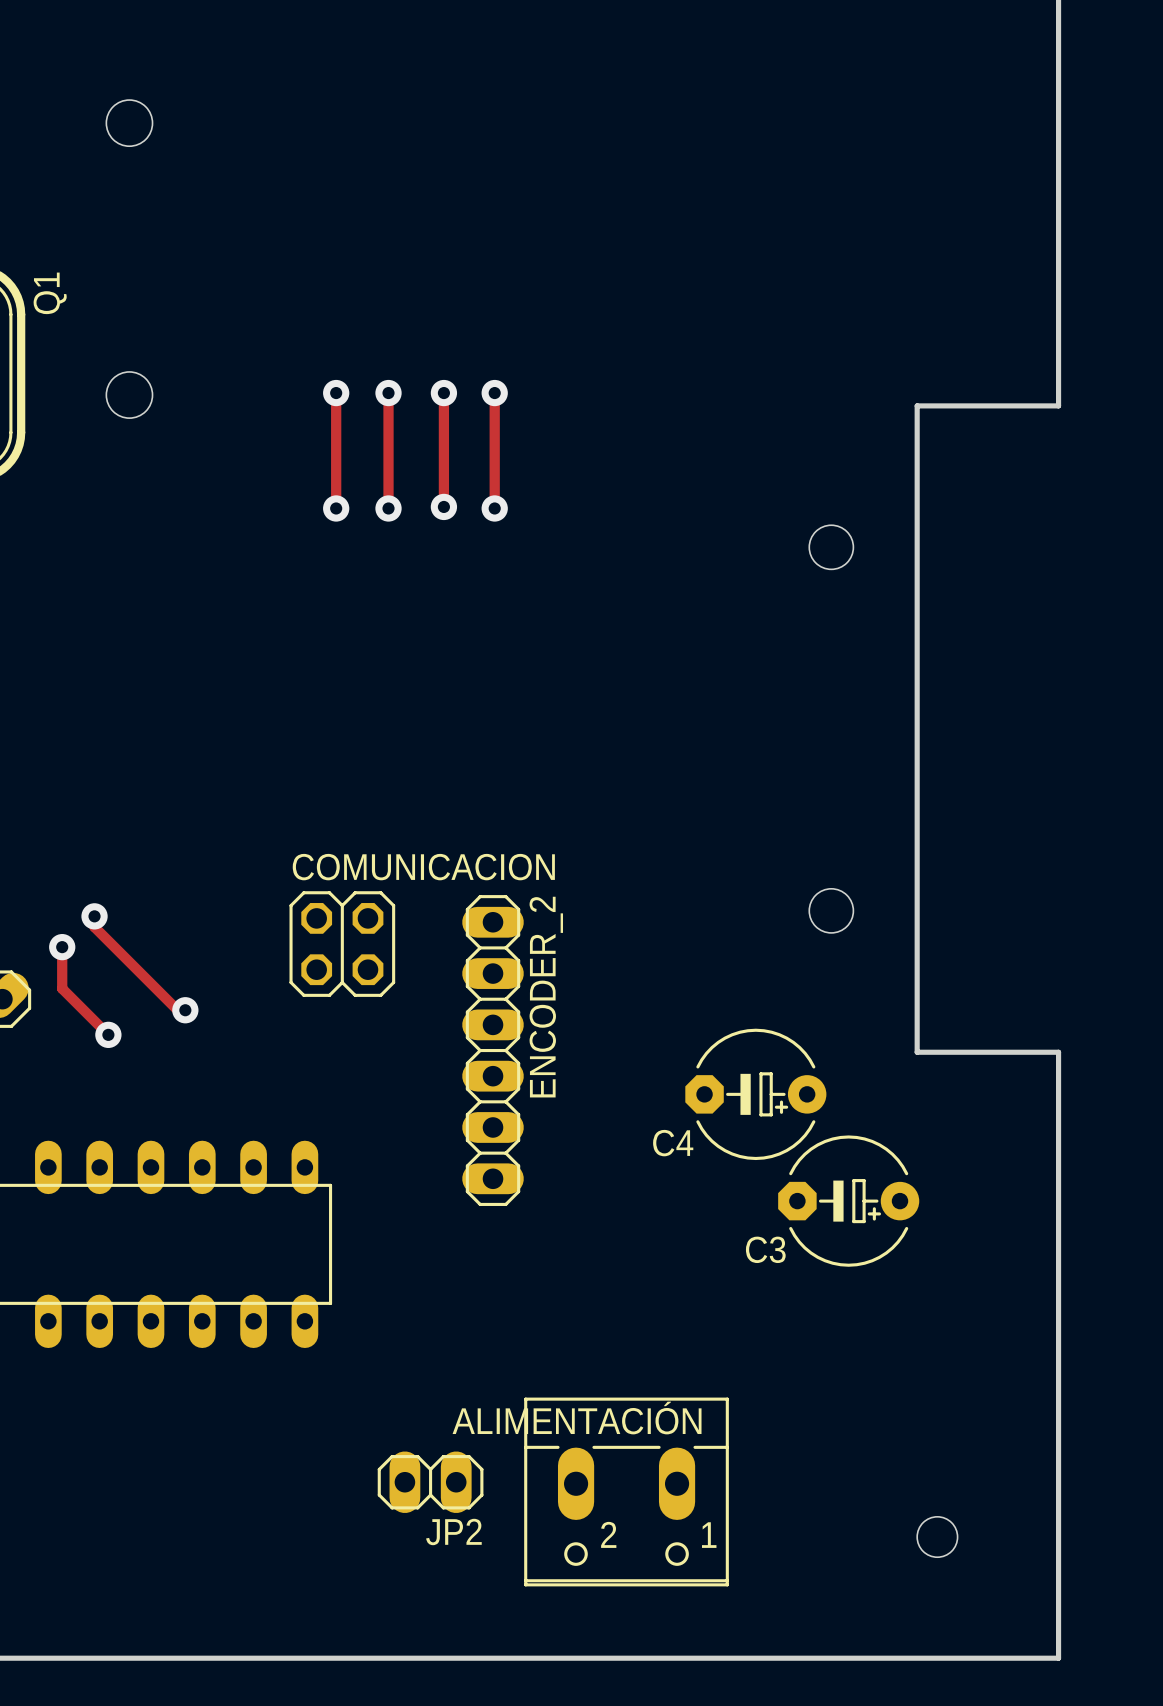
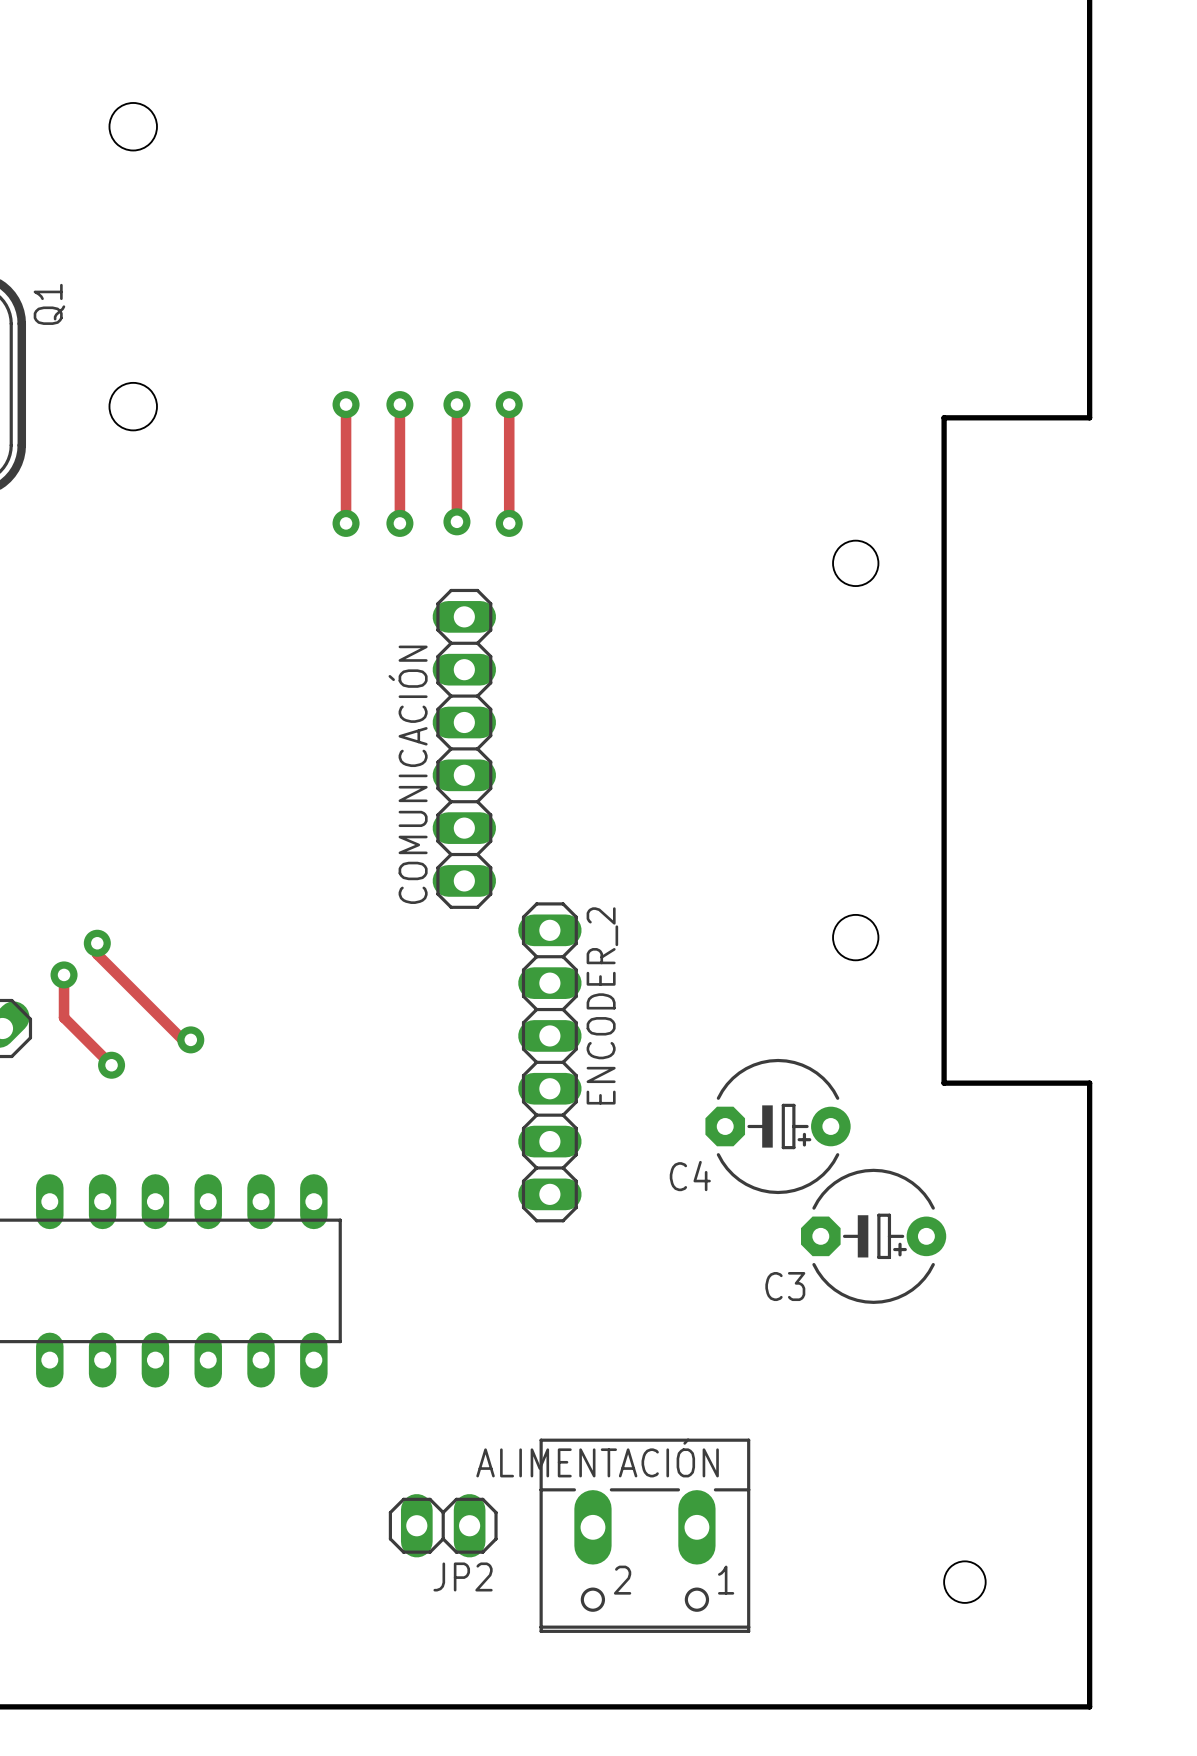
COMUNICACIÓN: none -> (464, 748)
COMUNICACION: (342, 944) -> none
ENCODER_2 position: (493, 1050) -> (549, 1062)

